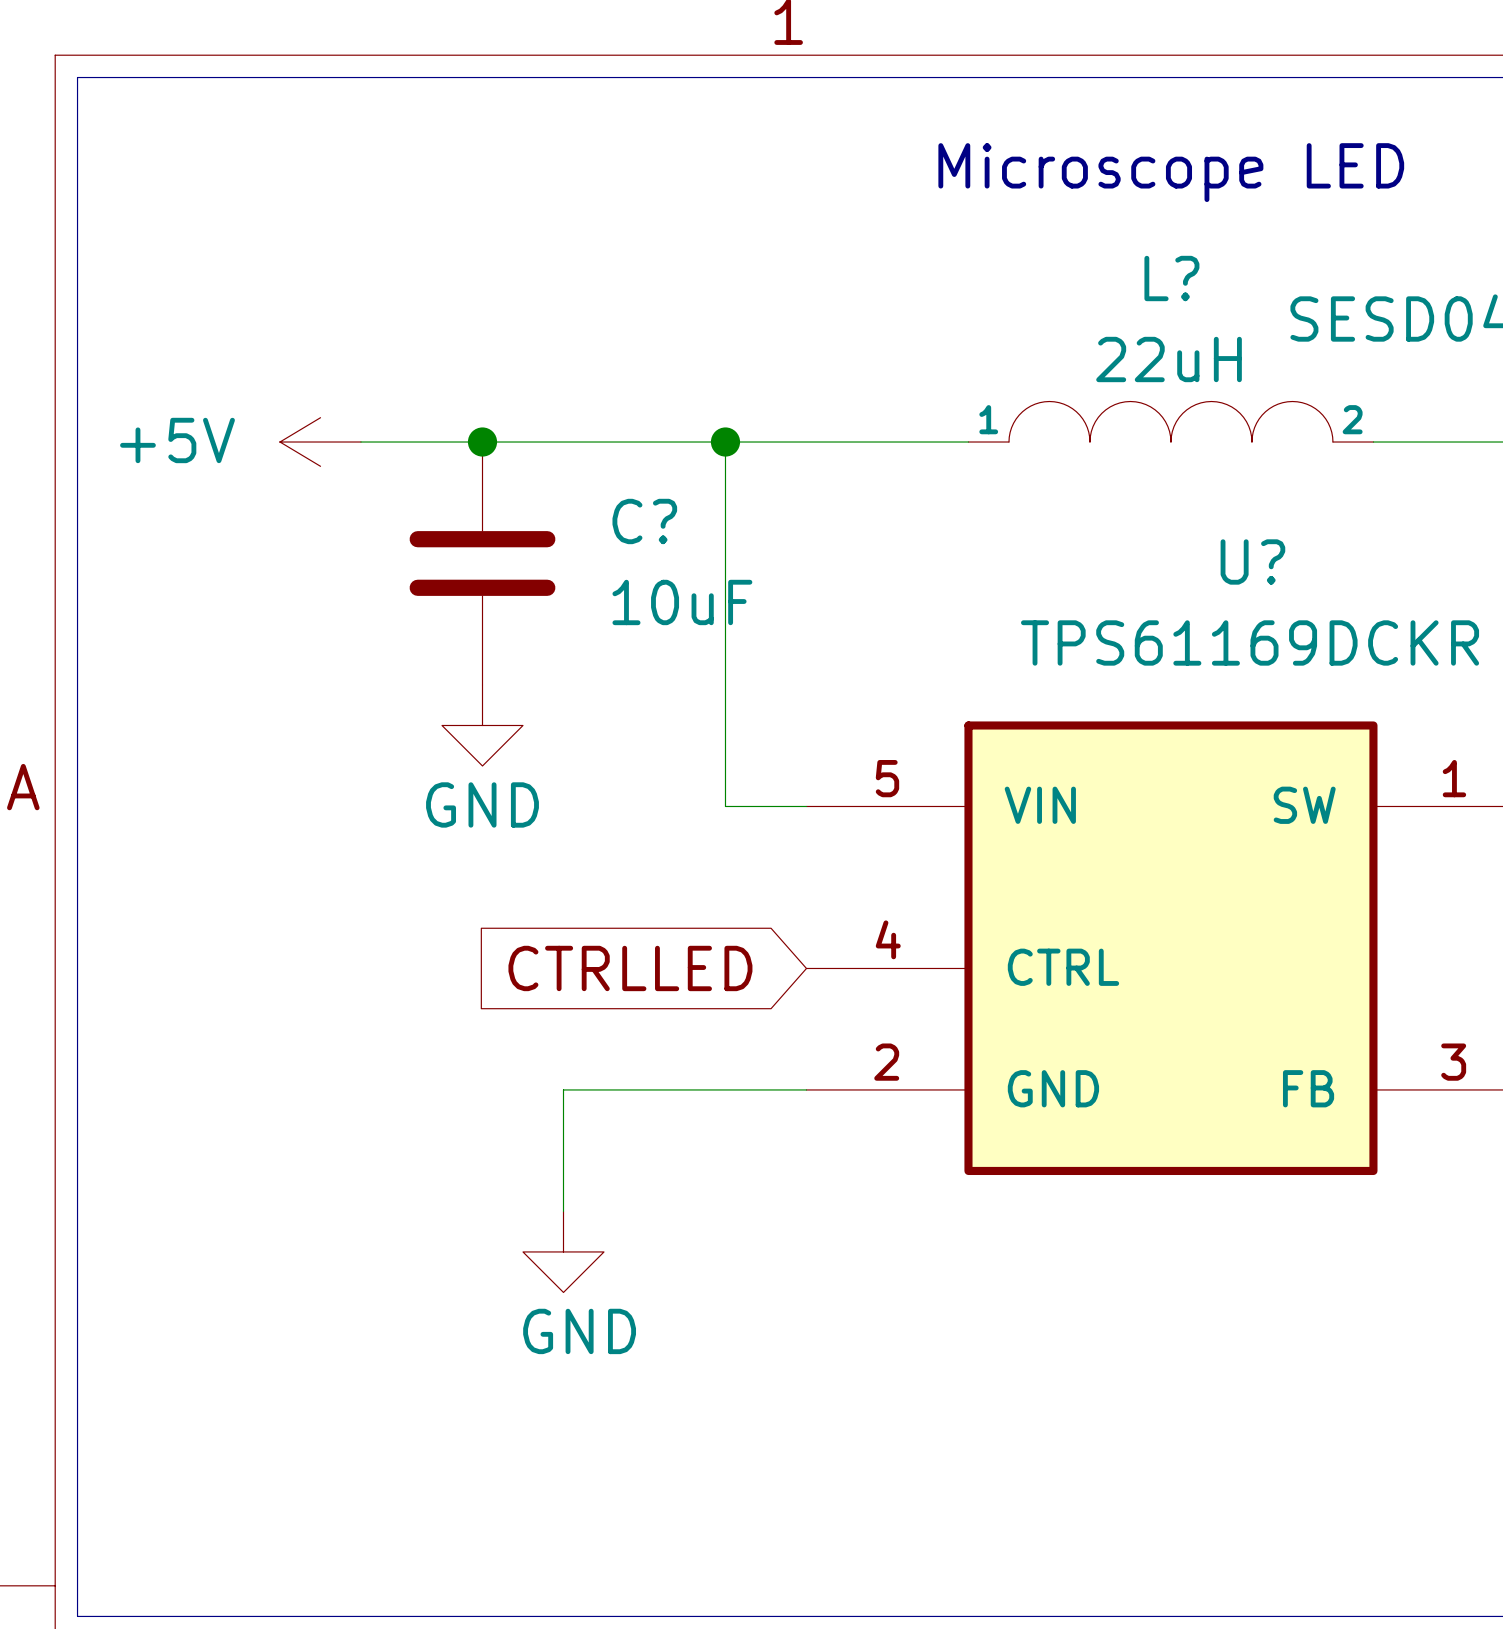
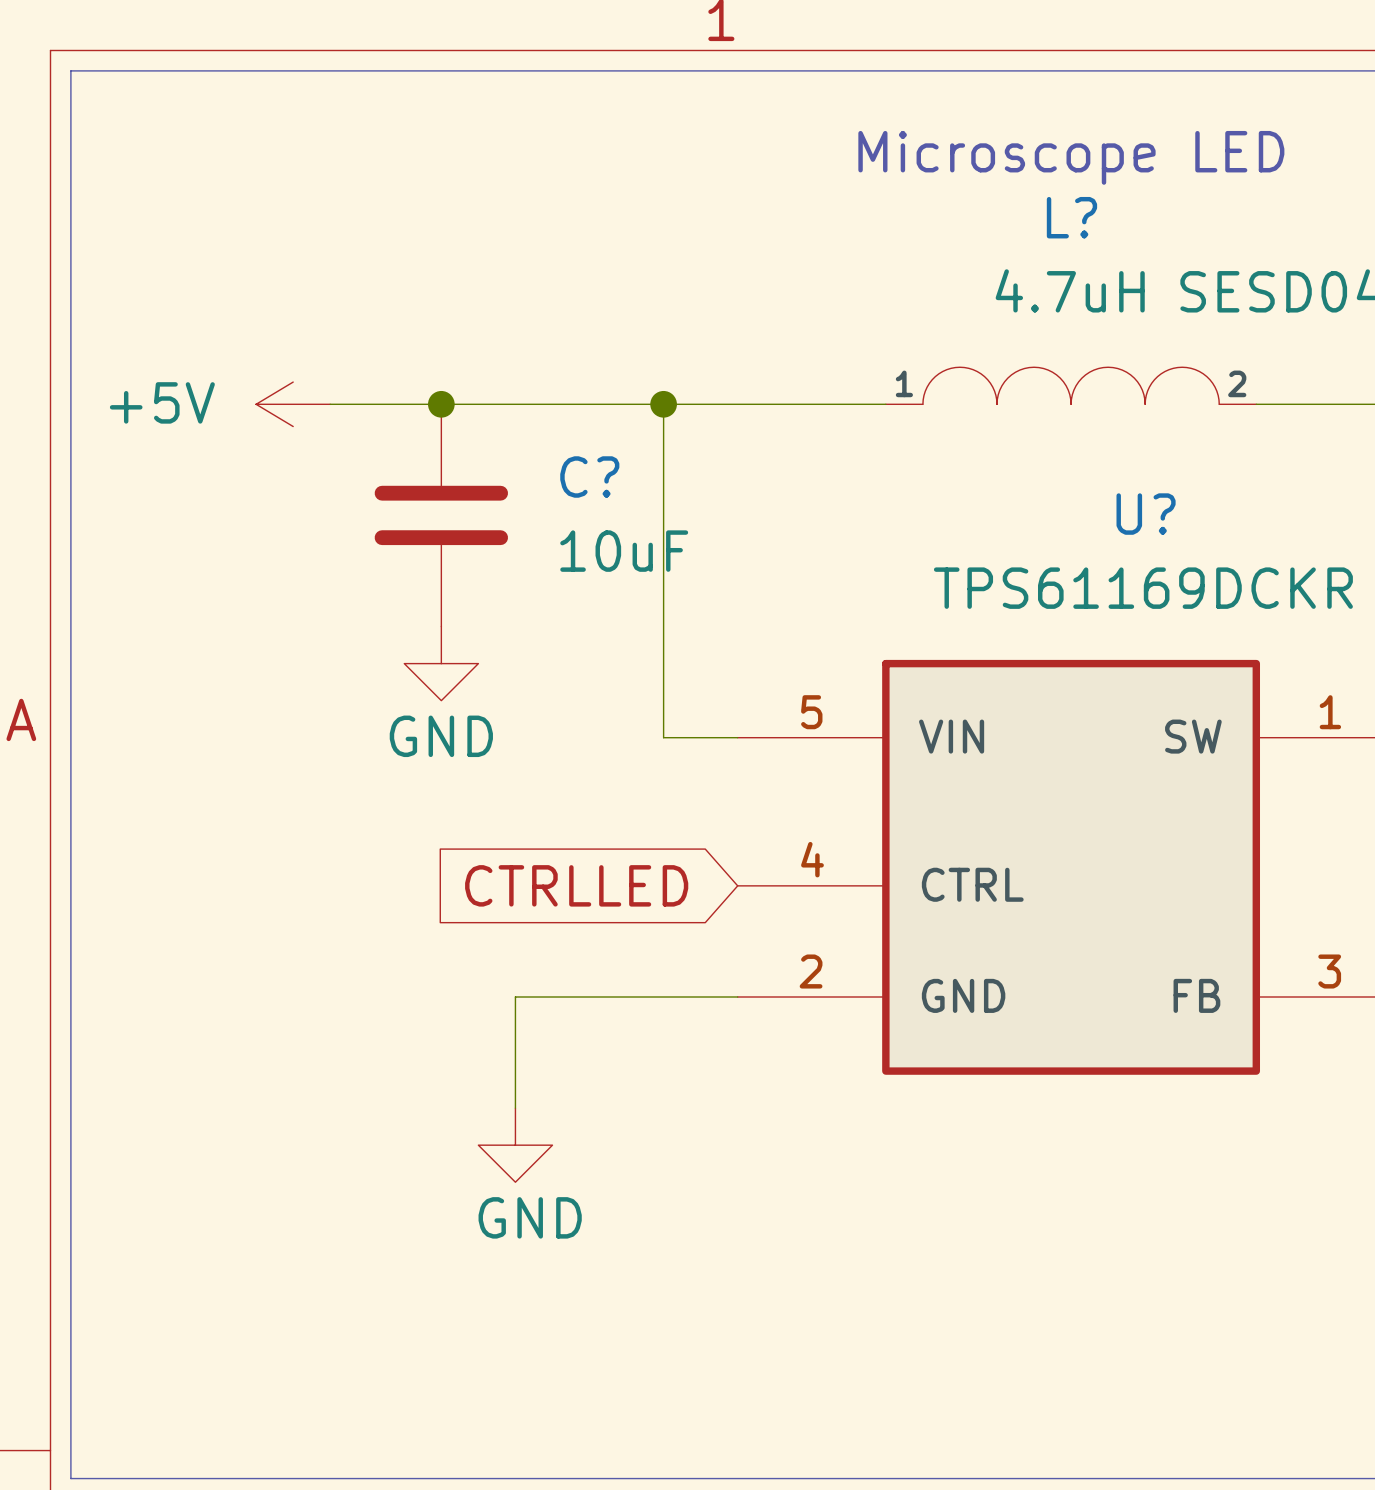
L? name position: L? (1171, 278) -> L? (1071, 217)
L? value: 22uH (1169, 359) -> 4.7uH (1070, 290)

